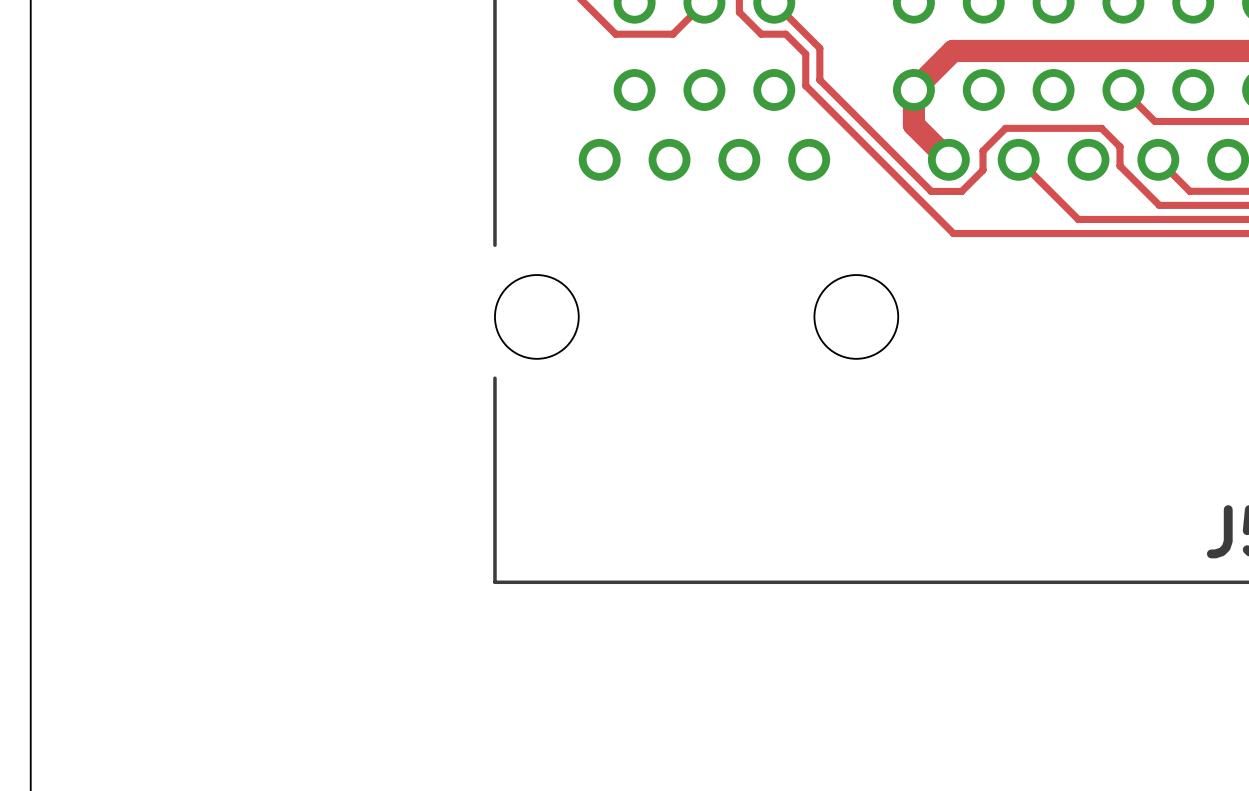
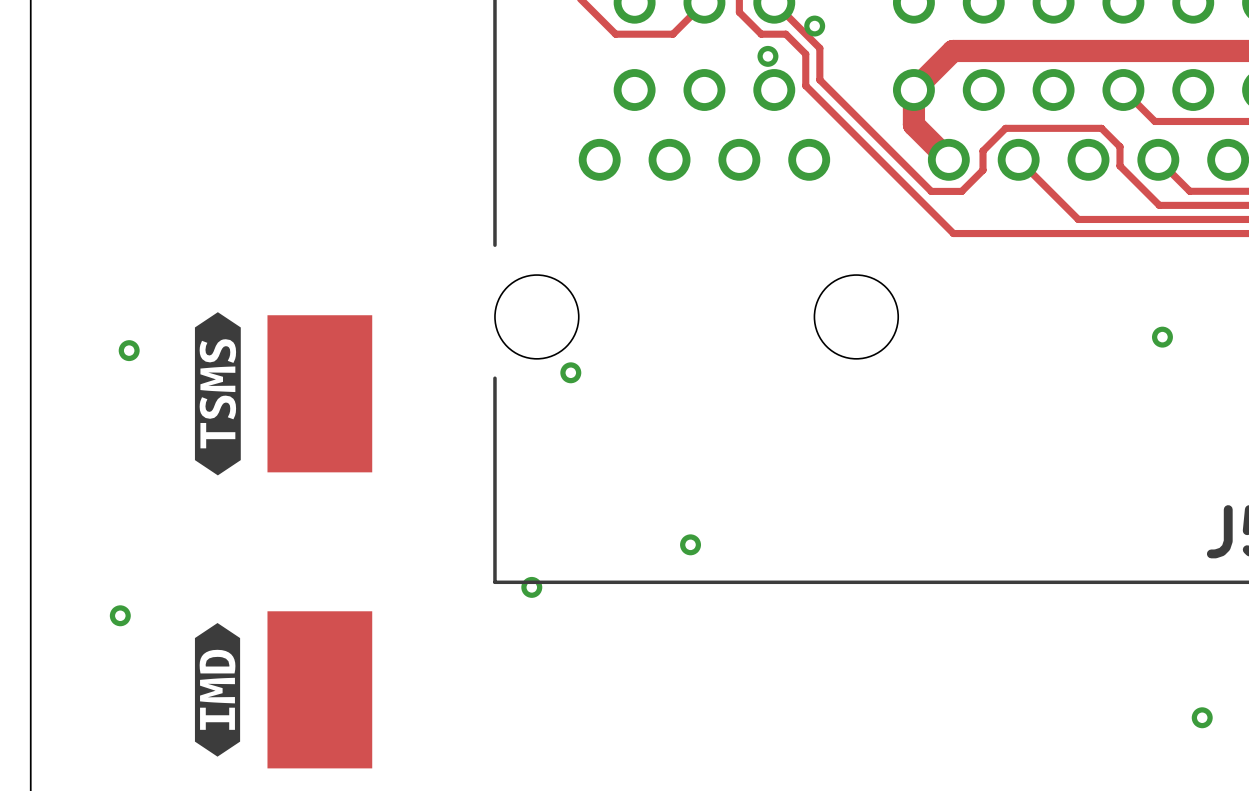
via: none -> (814, 26)
via: none -> (767, 56)
drawing: none -> [194, 312, 241, 476]
via: none -> (1162, 337)
via: none -> (129, 350)
via: none -> (570, 372)
part: none -> (319, 393)
via: none -> (690, 544)
via: none -> (531, 587)
via: none -> (120, 615)
drawing: none -> [194, 623, 241, 757]
part: none -> (319, 689)
via: none -> (1202, 717)

